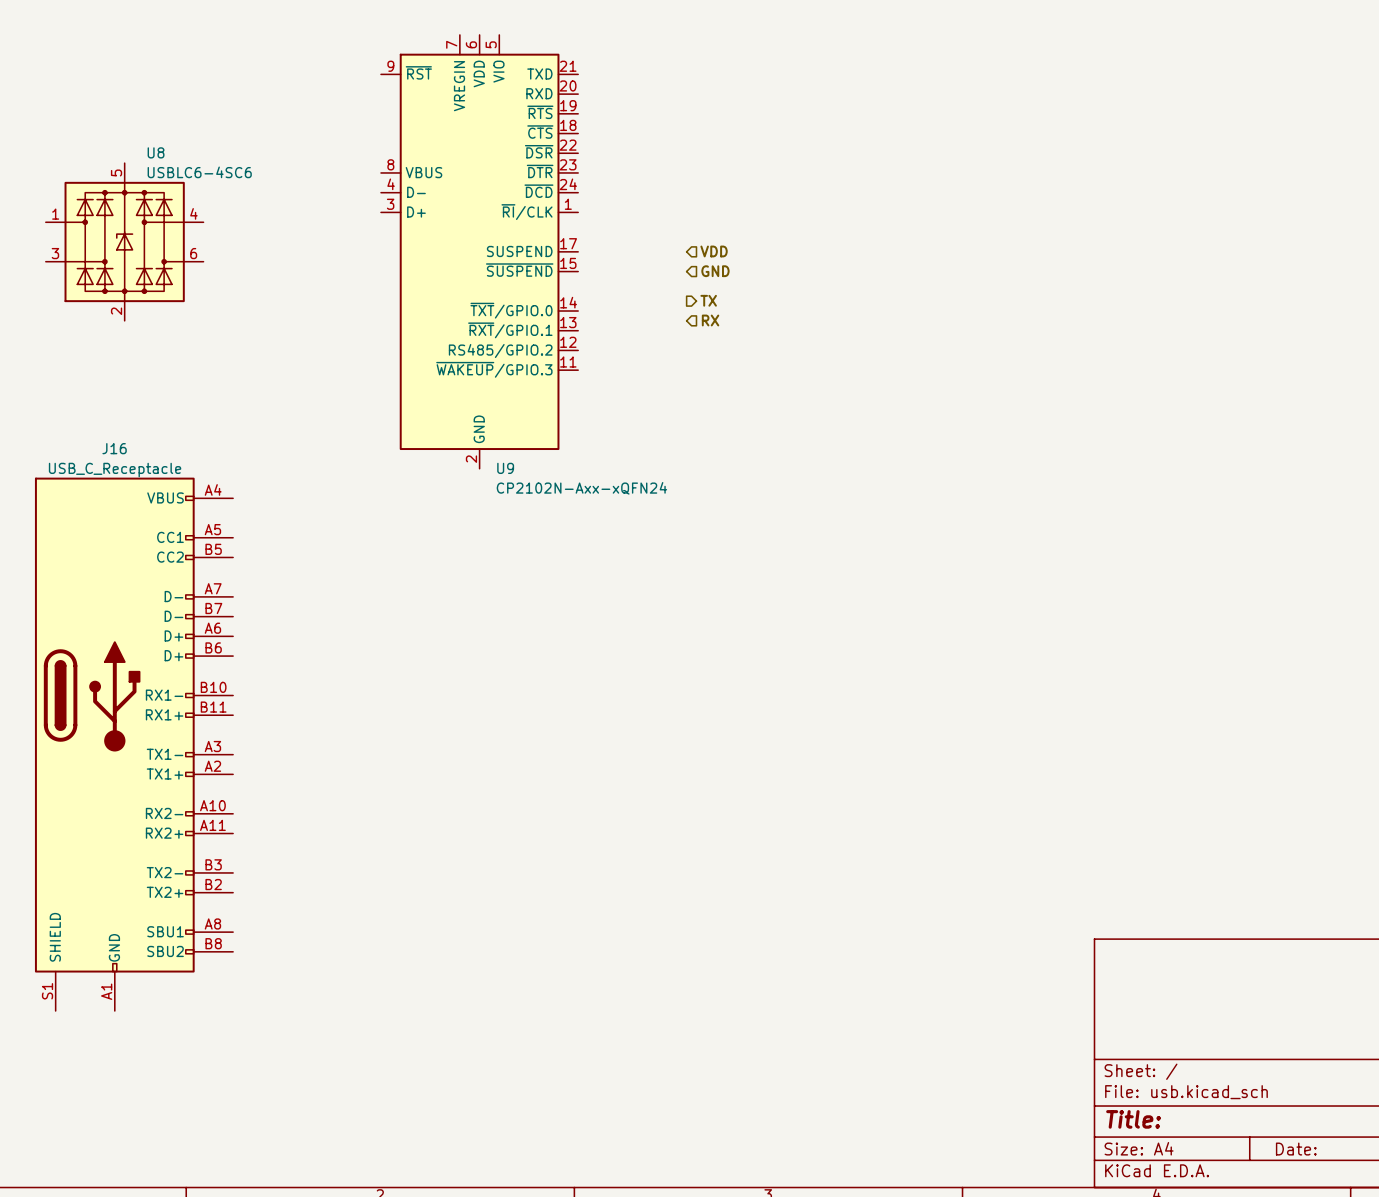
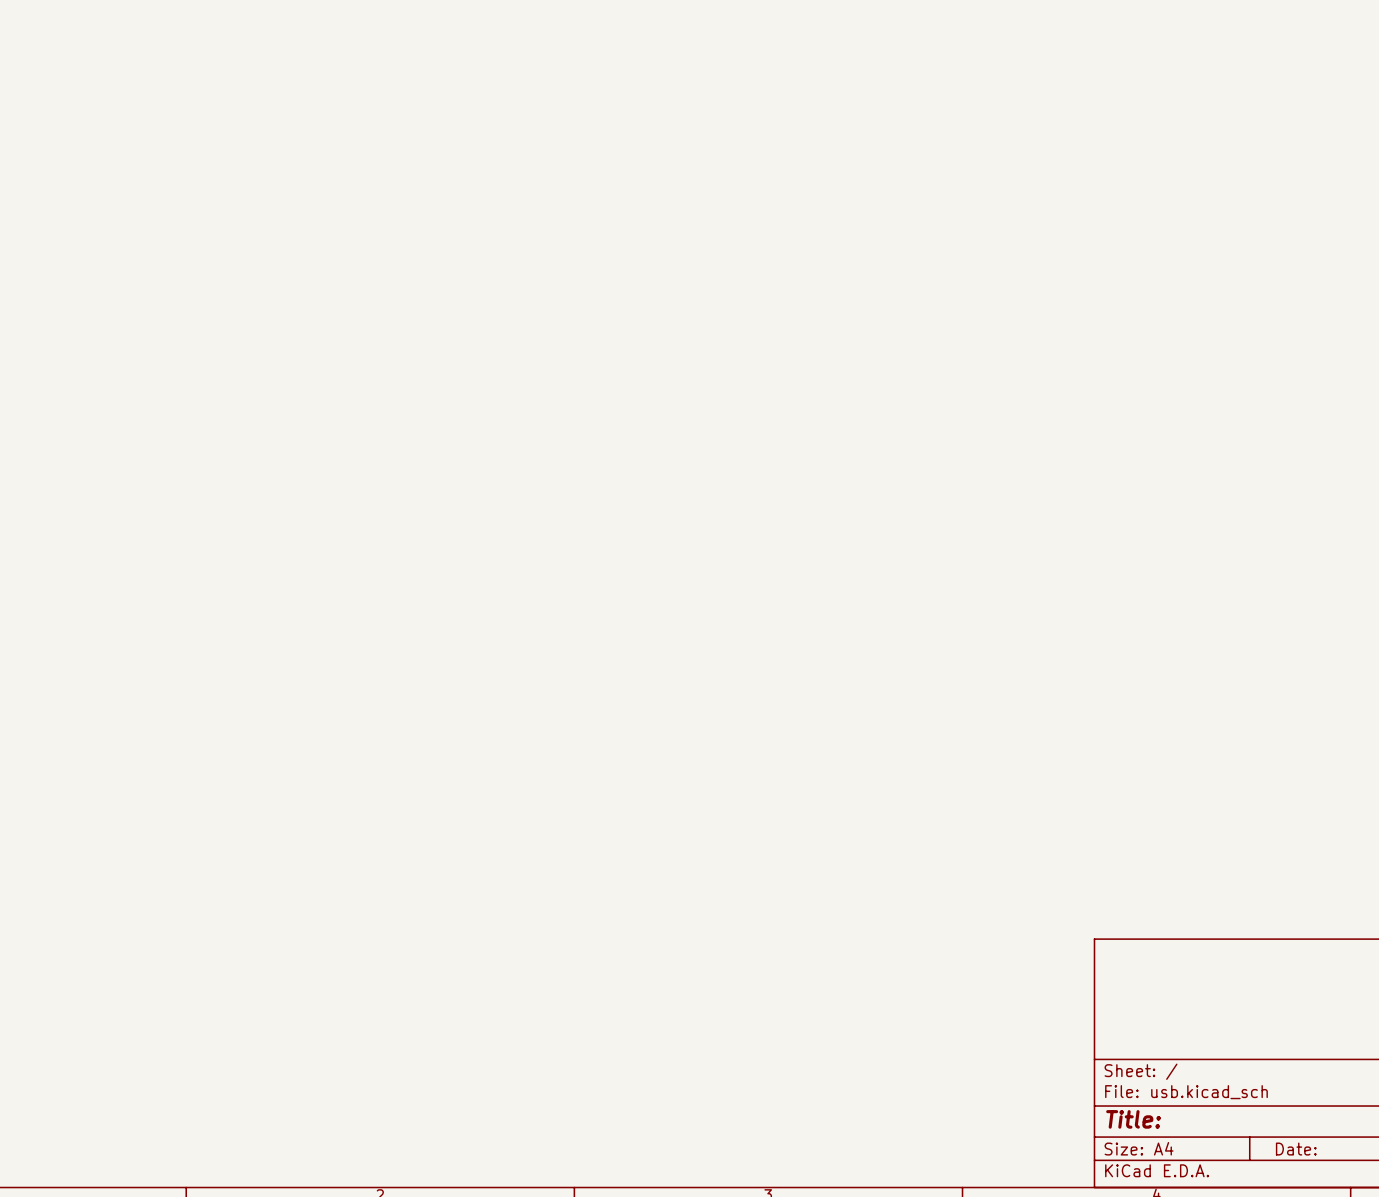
U8: USBLC6-4SC6 (124, 241) -> none
U9: CP2102N-Axx-xQFN24 (479, 251) -> none
hierarchical label: VDD (714, 251) -> none
hierarchical label: GND (715, 271) -> none
hierarchical label: TX (708, 300) -> none
hierarchical label: RX (710, 320) -> none
J16: USB_C_Receptacle (134, 744) -> none

